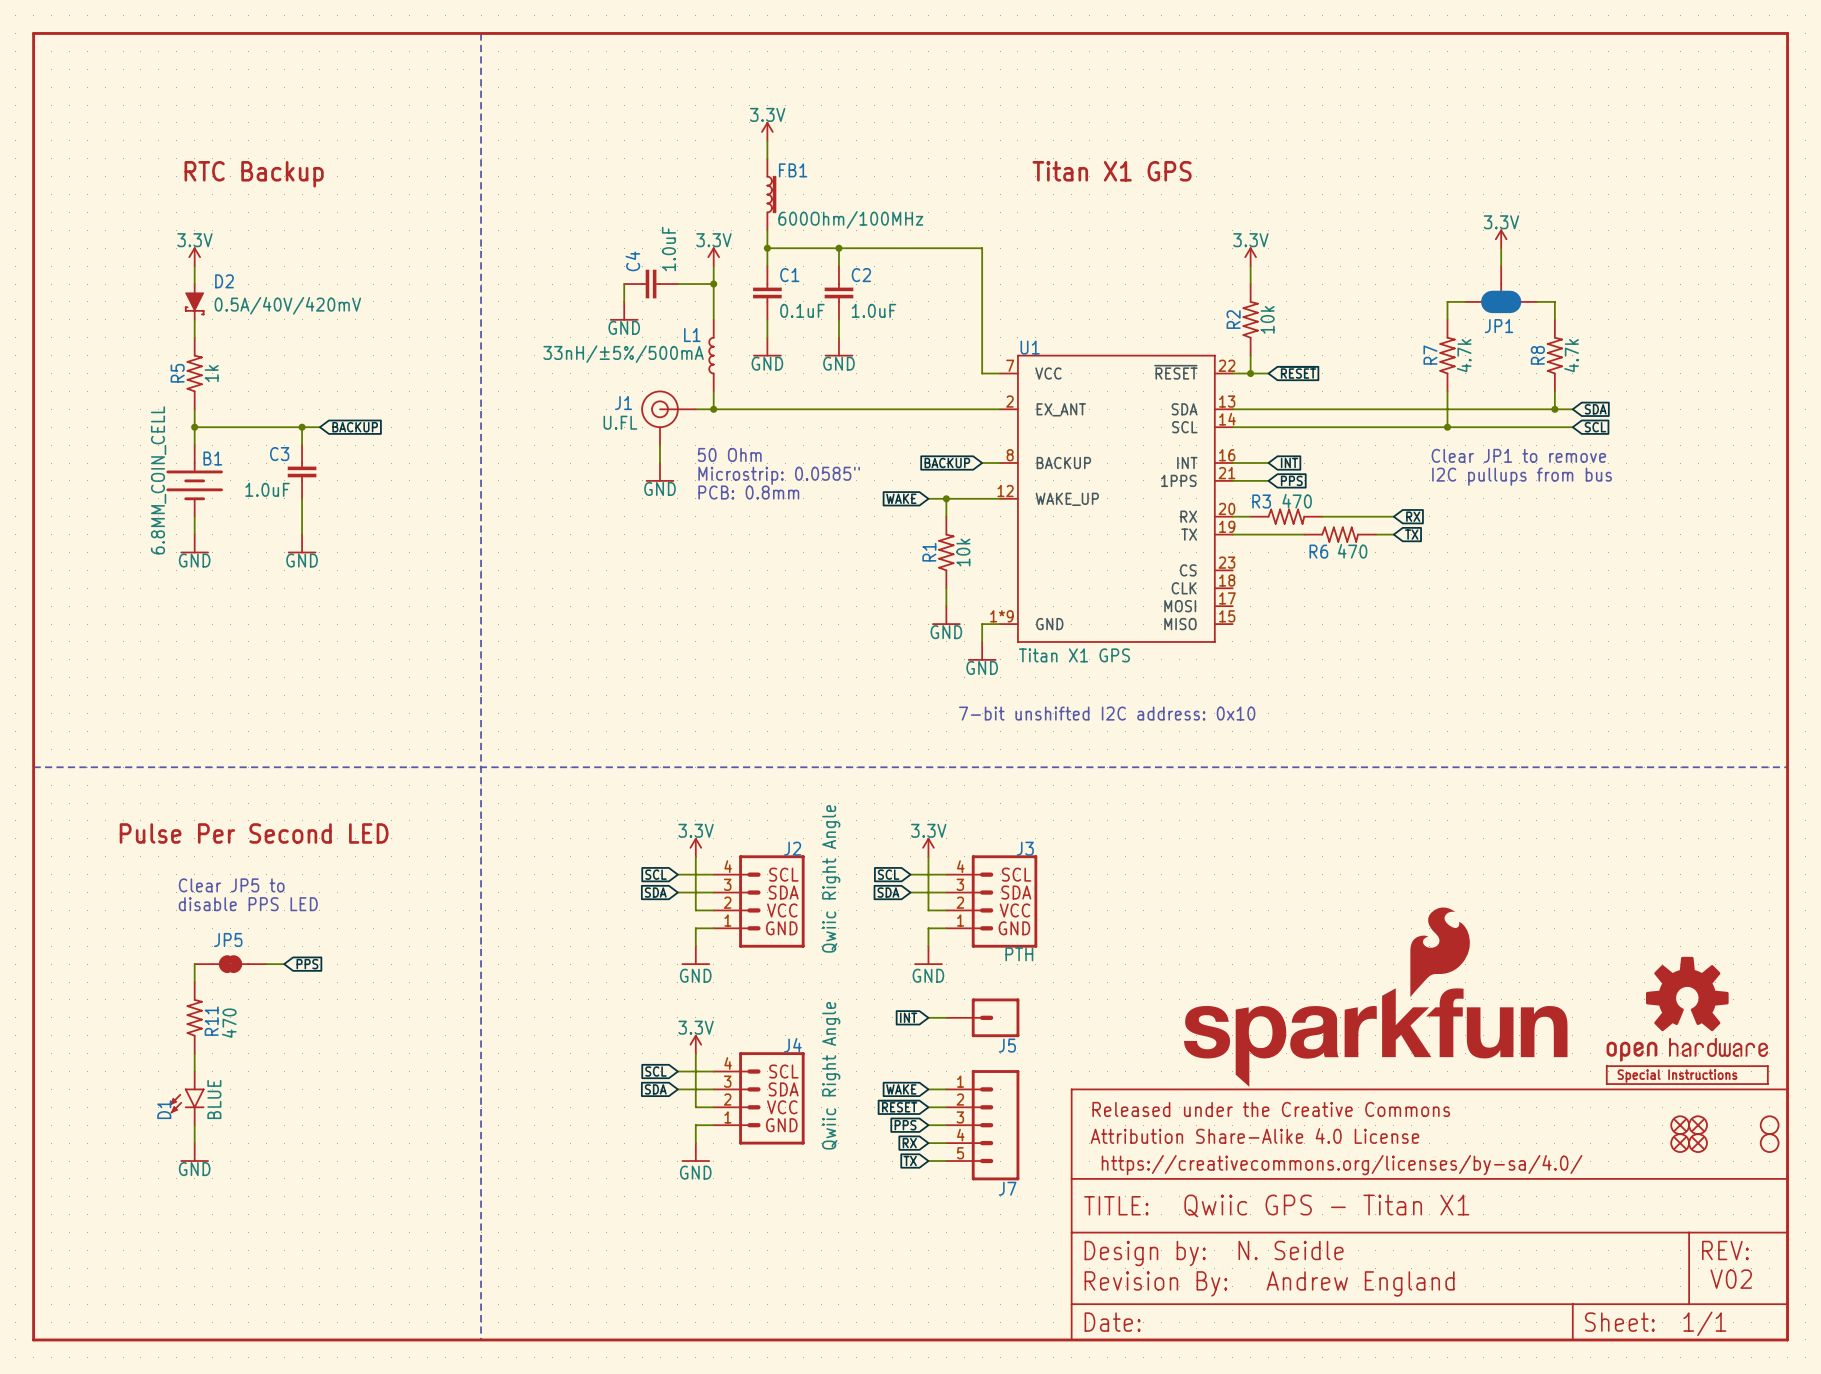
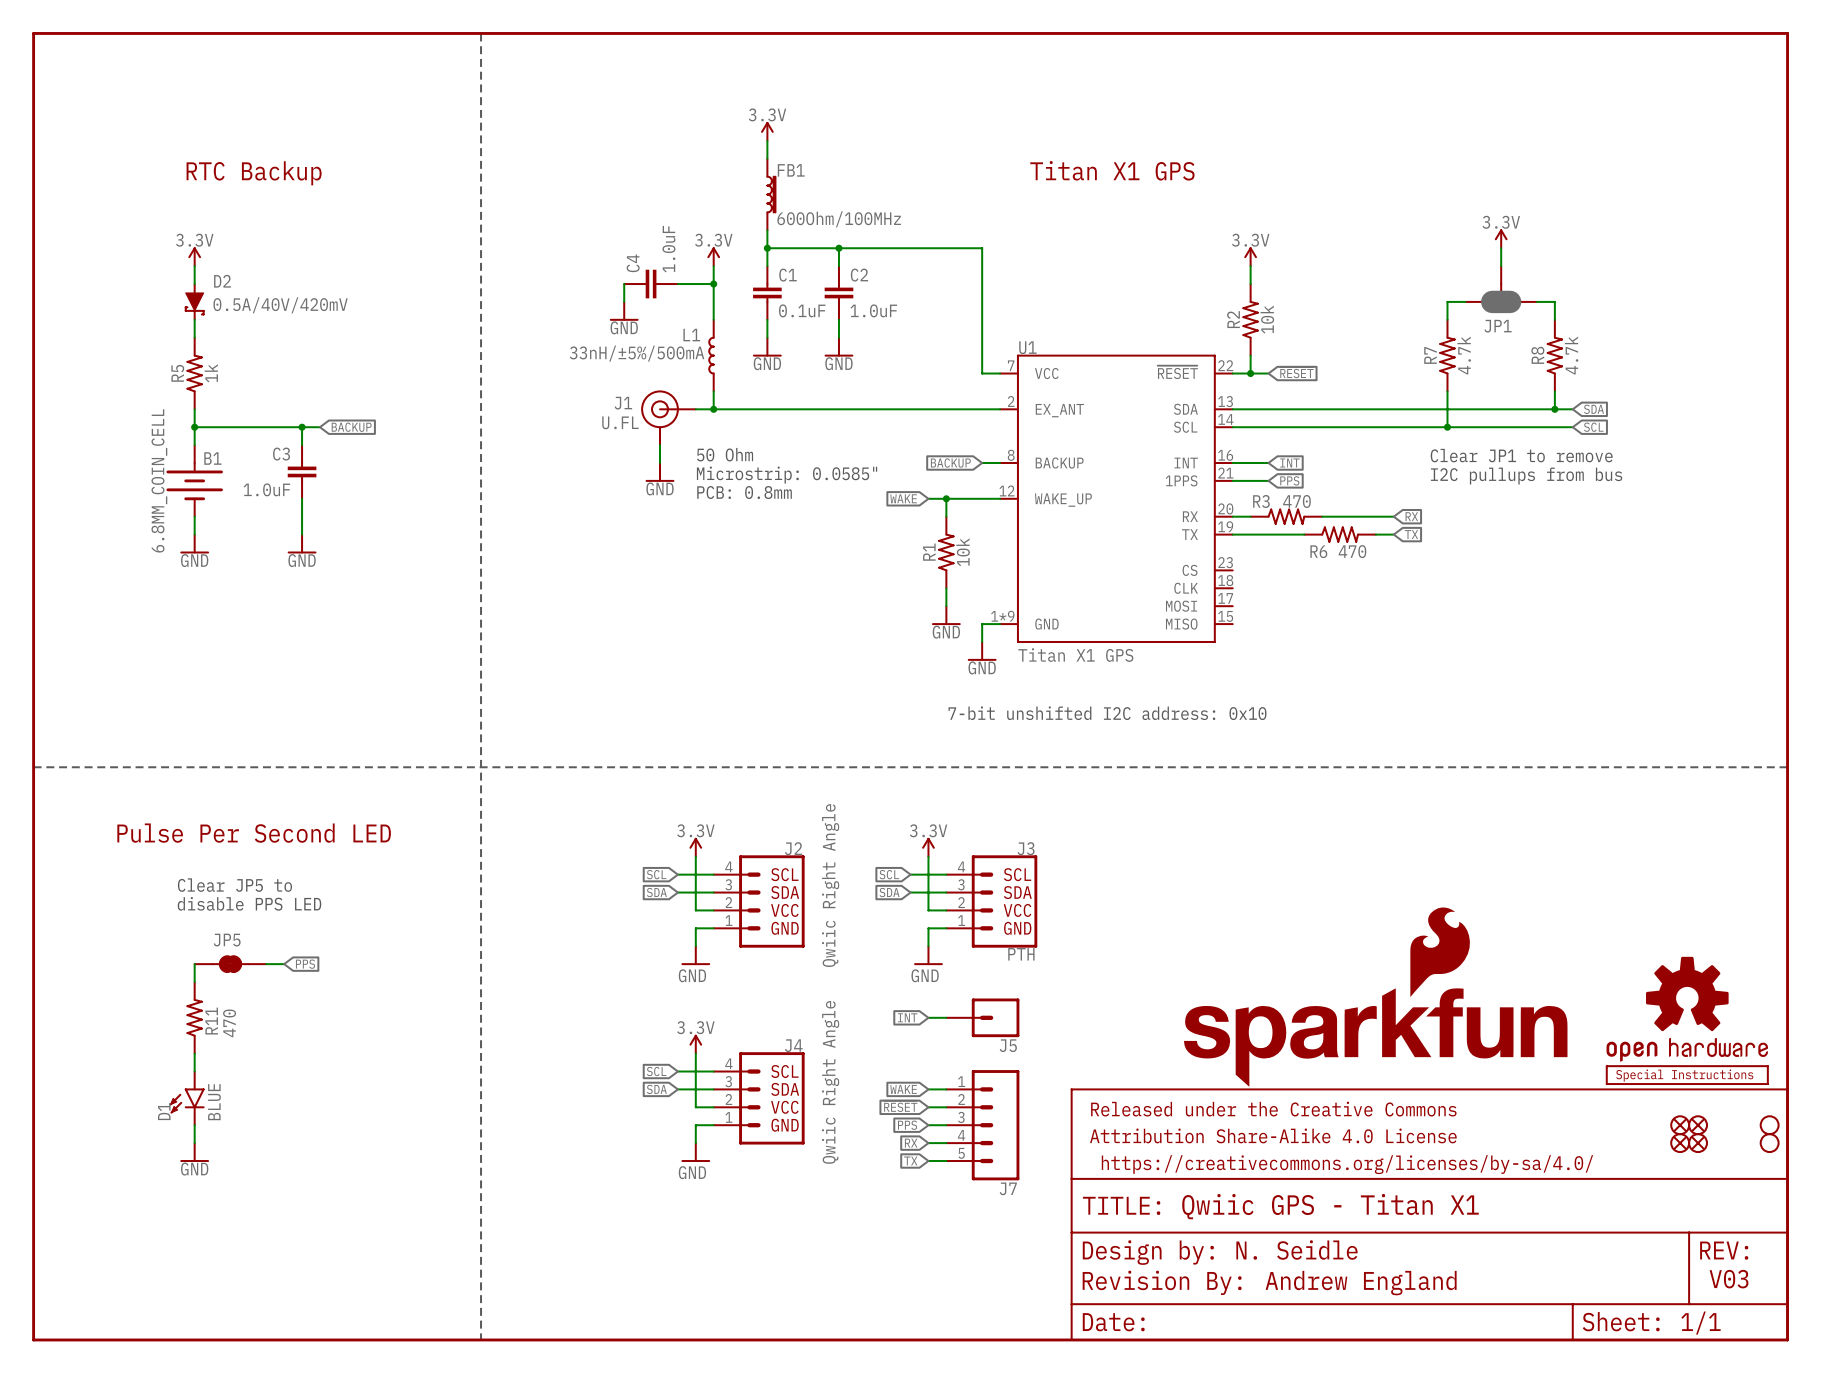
text: V02 (1731, 1279) -> V03 (1729, 1279)

